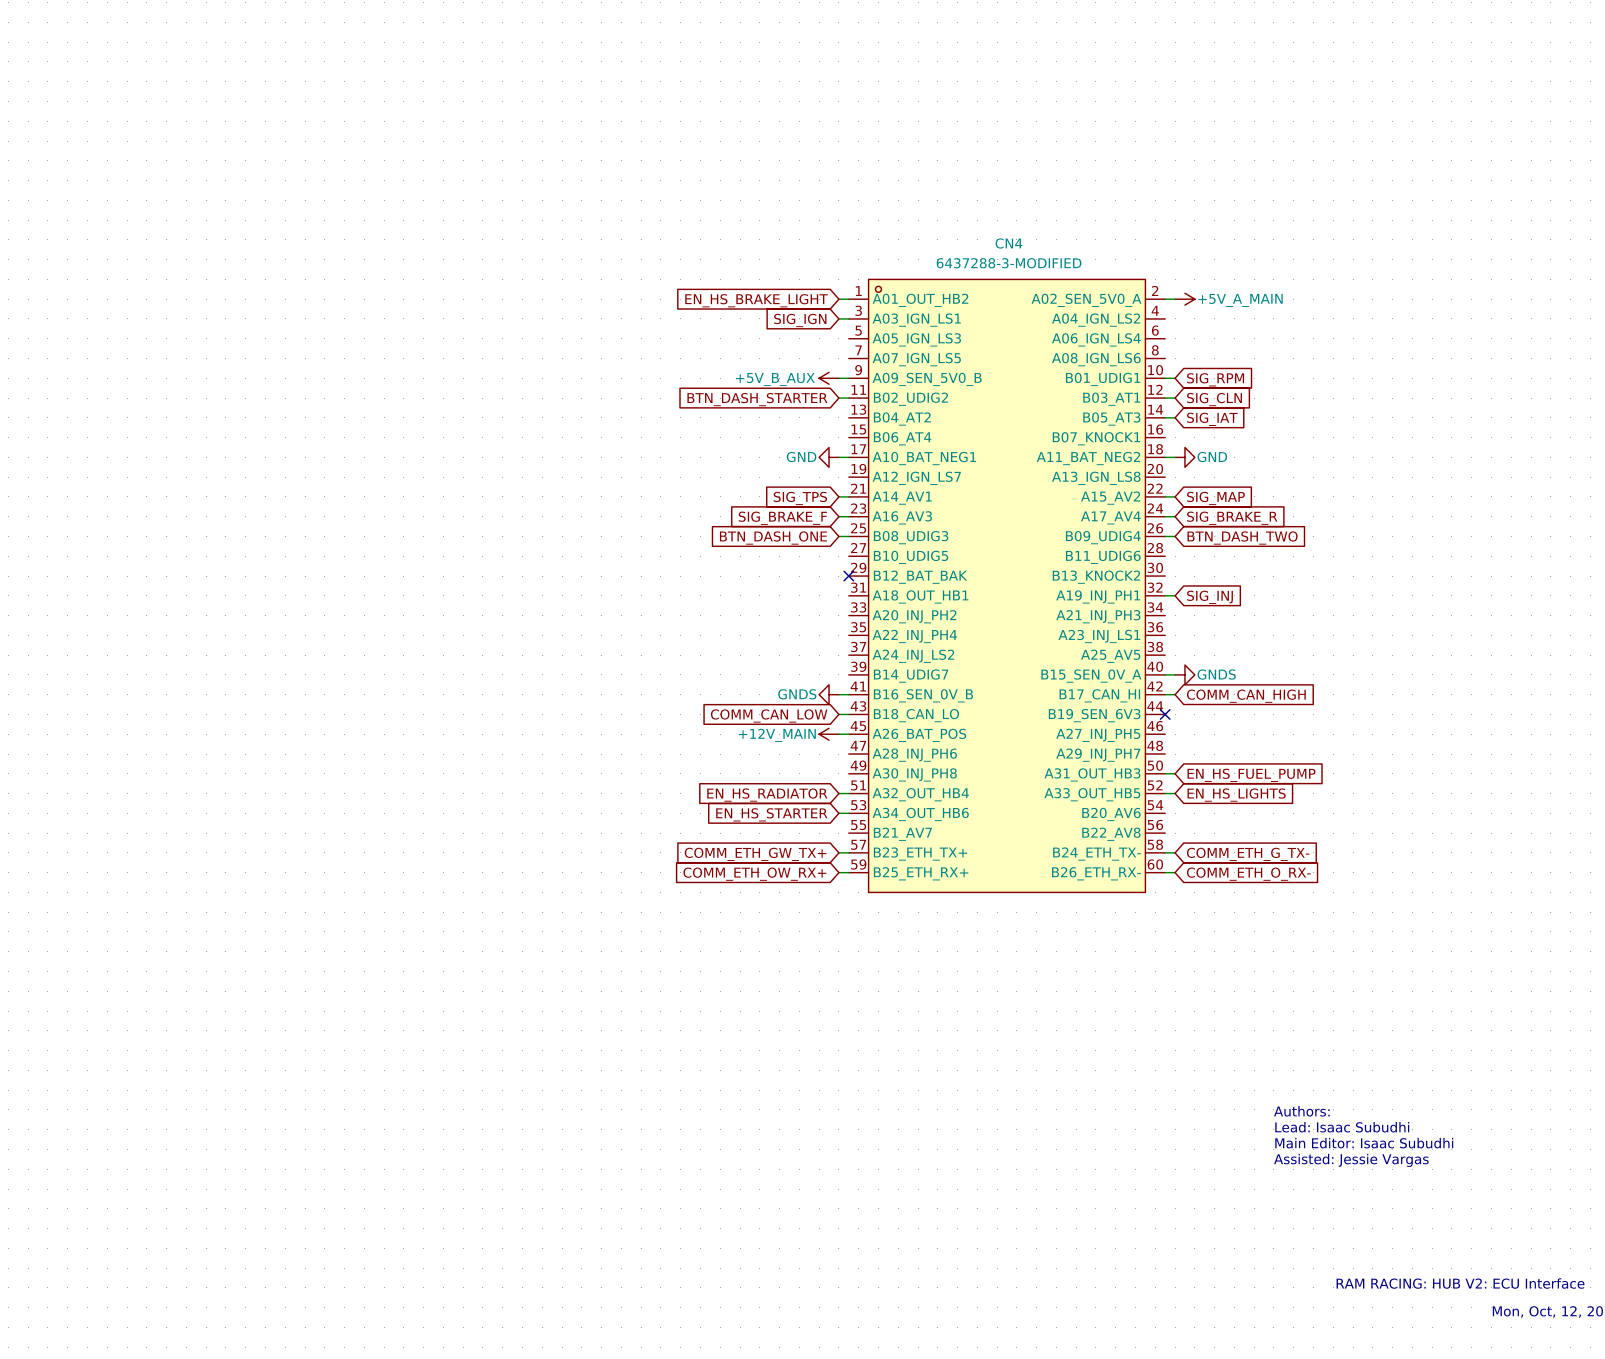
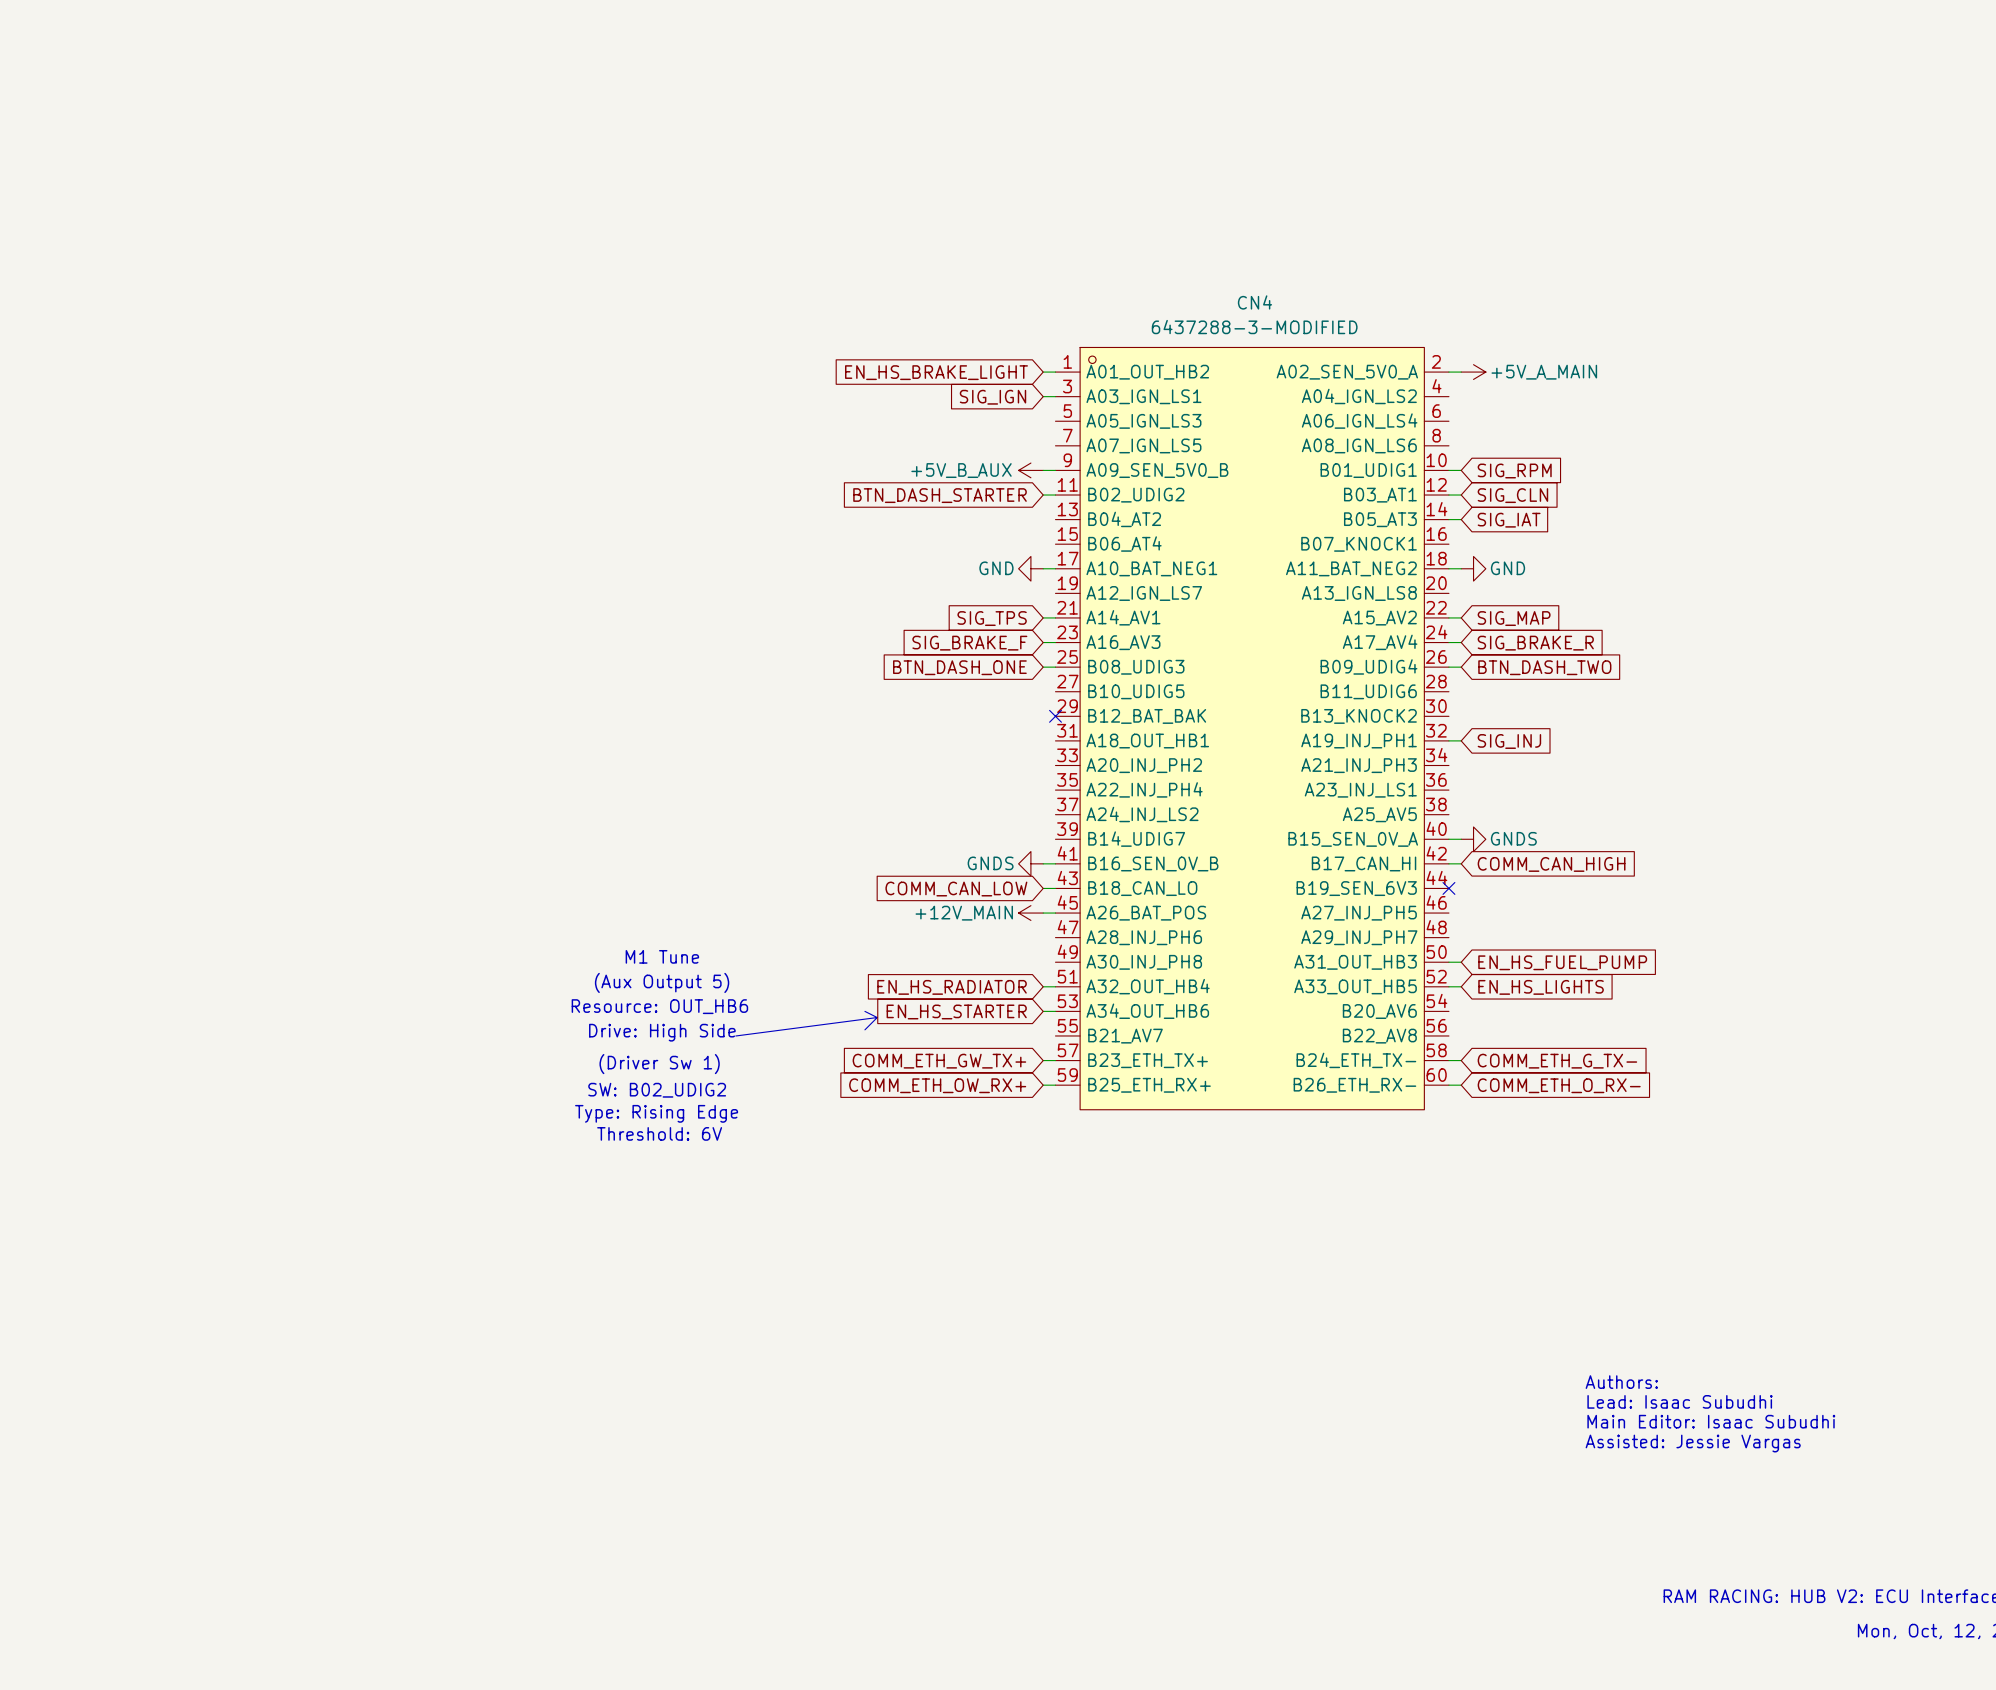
text: none -> M1 Tune (662, 956)
text: none -> (Aux Output 5) (662, 982)
text: none -> Resource: OUT_HB6 (659, 1006)
line: none -> (864, 1011) (877, 1017)
line: none -> (877, 1017) (735, 1035)
line: none -> (877, 1017) (864, 1029)
text: none -> Drive: High Side (662, 1032)
text: none -> (Driver Sw 1) (659, 1064)
text: none -> SW: B02_UDIG2 (657, 1090)
text: none -> Type: Rising Edge (656, 1113)
text: none -> Threshold: 6V (659, 1133)

